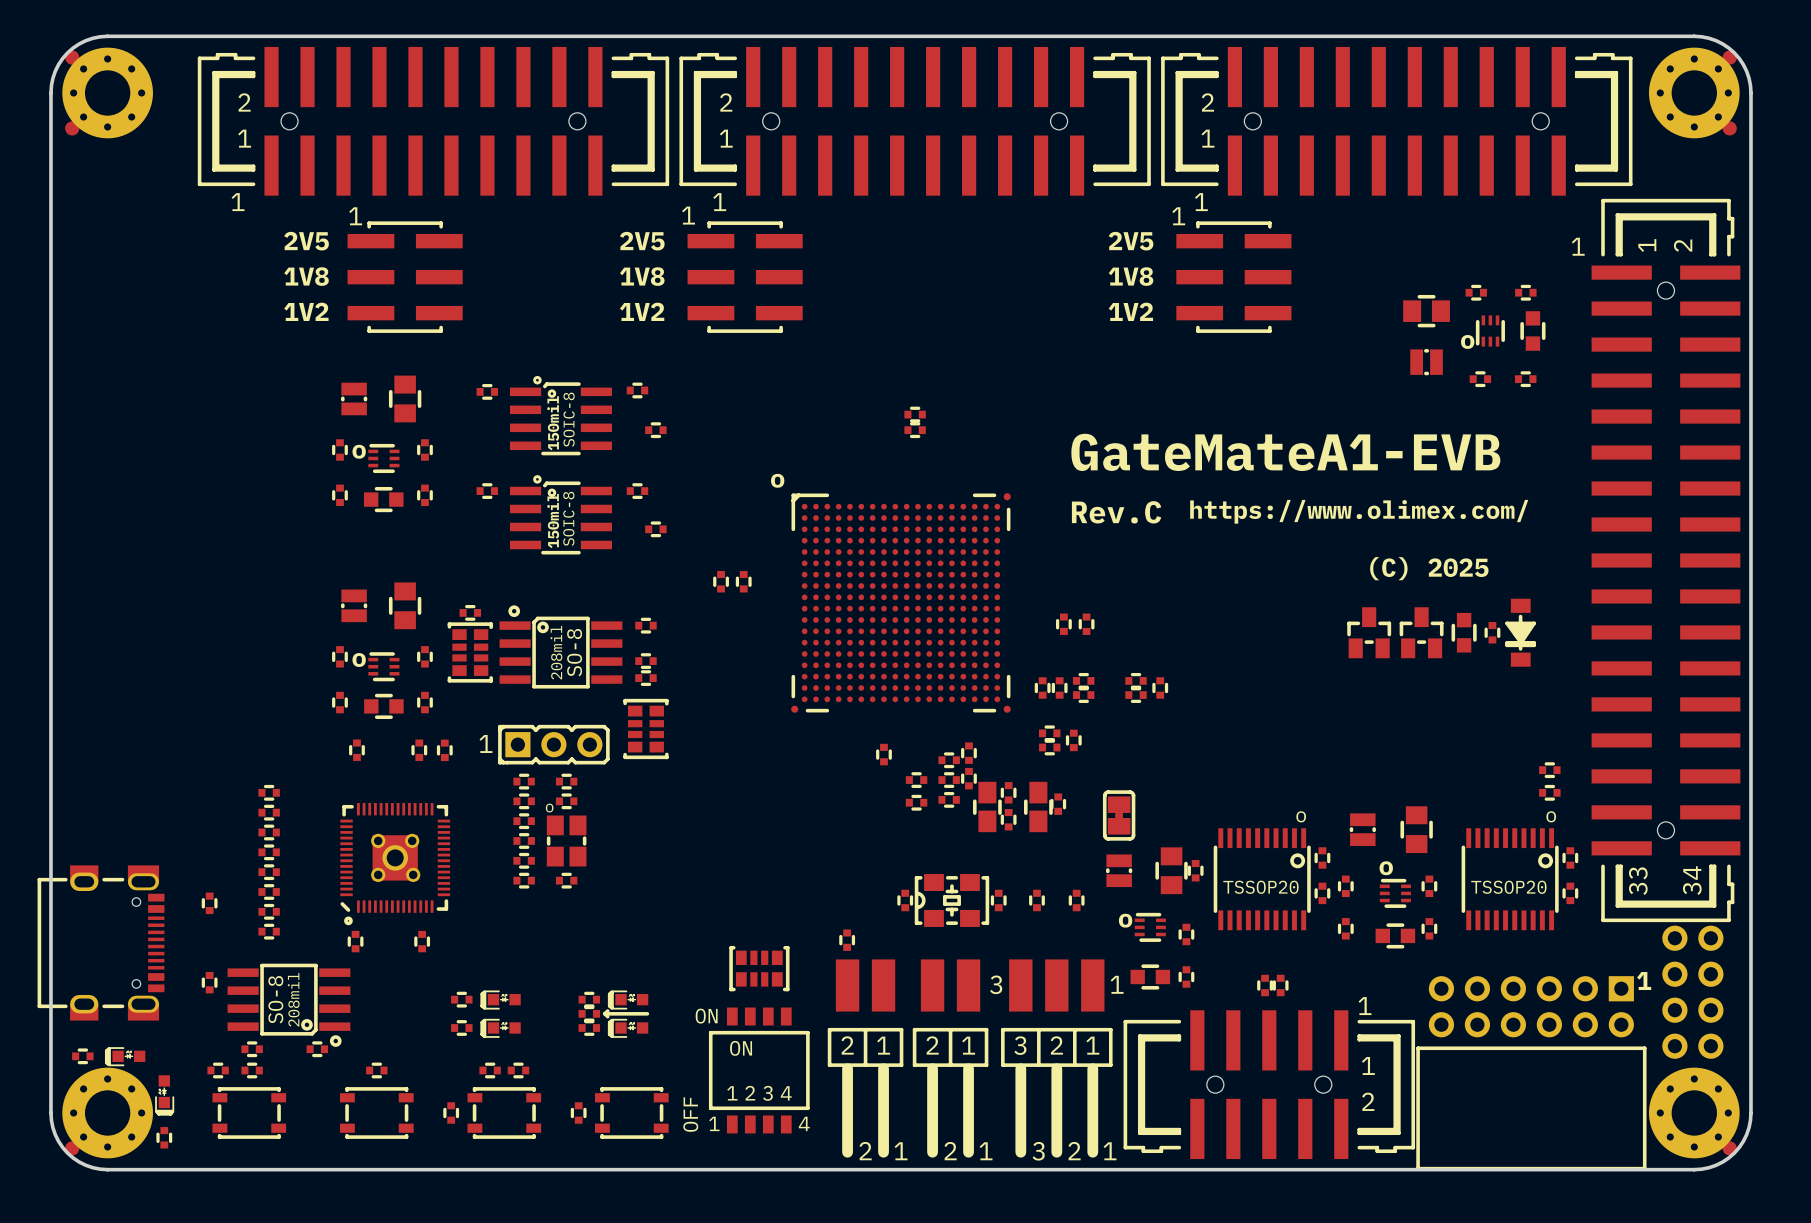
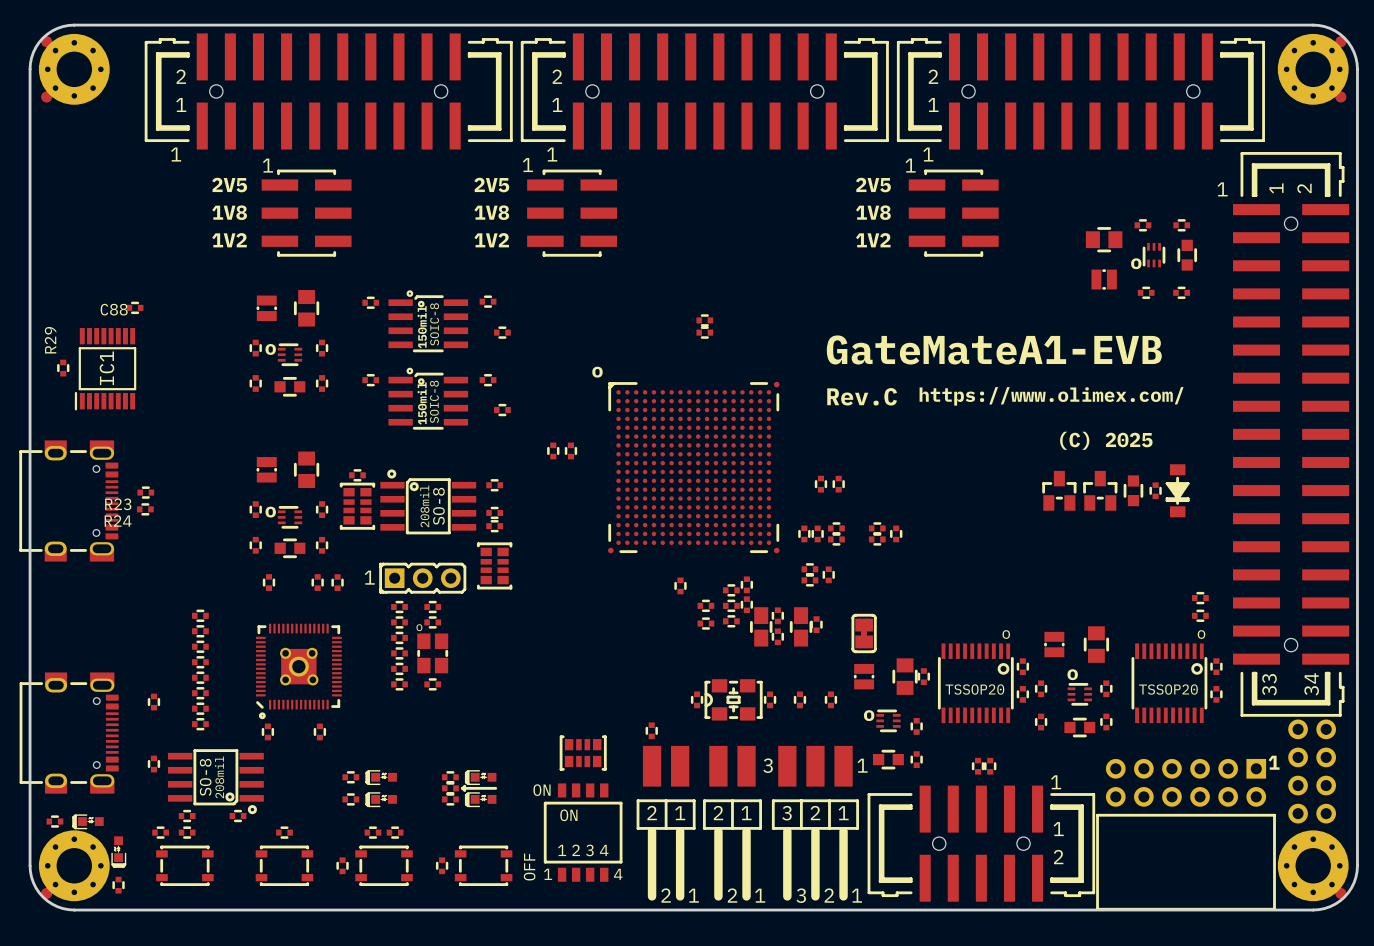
C88: none -> (135, 307)
R29: none -> (63, 368)
IC1: none -> (105, 369)
R23: none -> (145, 492)
part: none -> (68, 500)
R24: none -> (145, 509)

